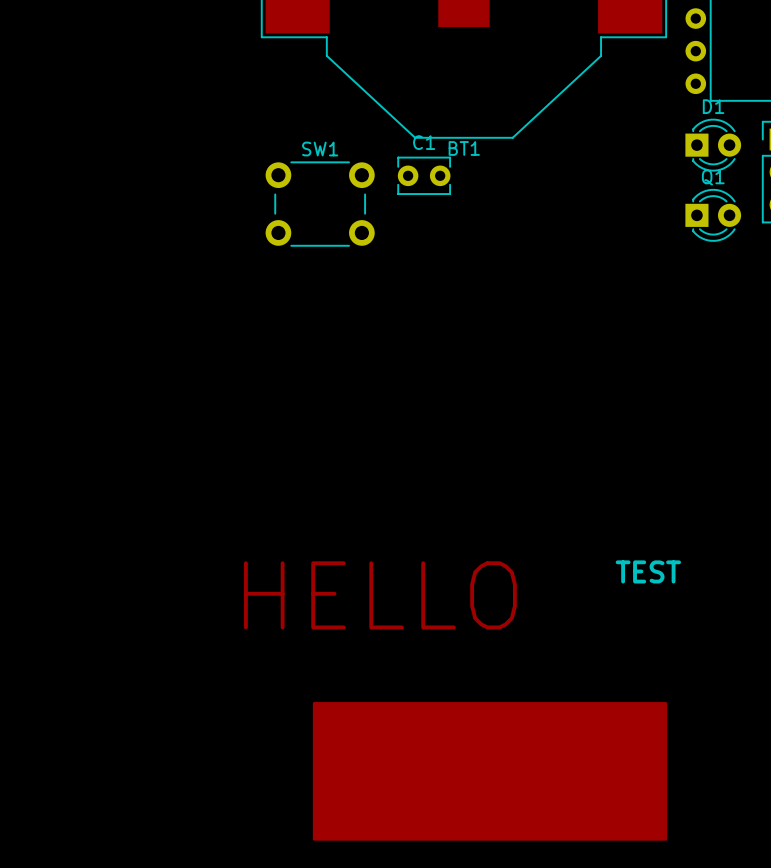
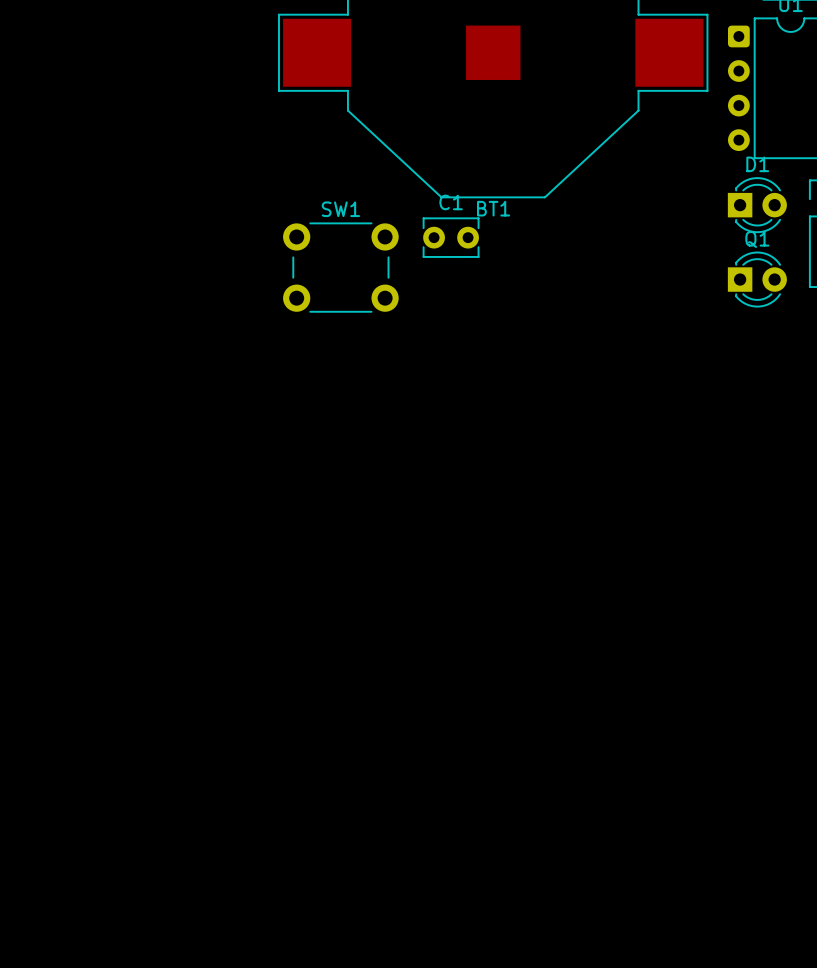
text: TEST (648, 571) -> none
text: HELLO (380, 595) -> none
drawing: [312, 702, 668, 841] -> none

